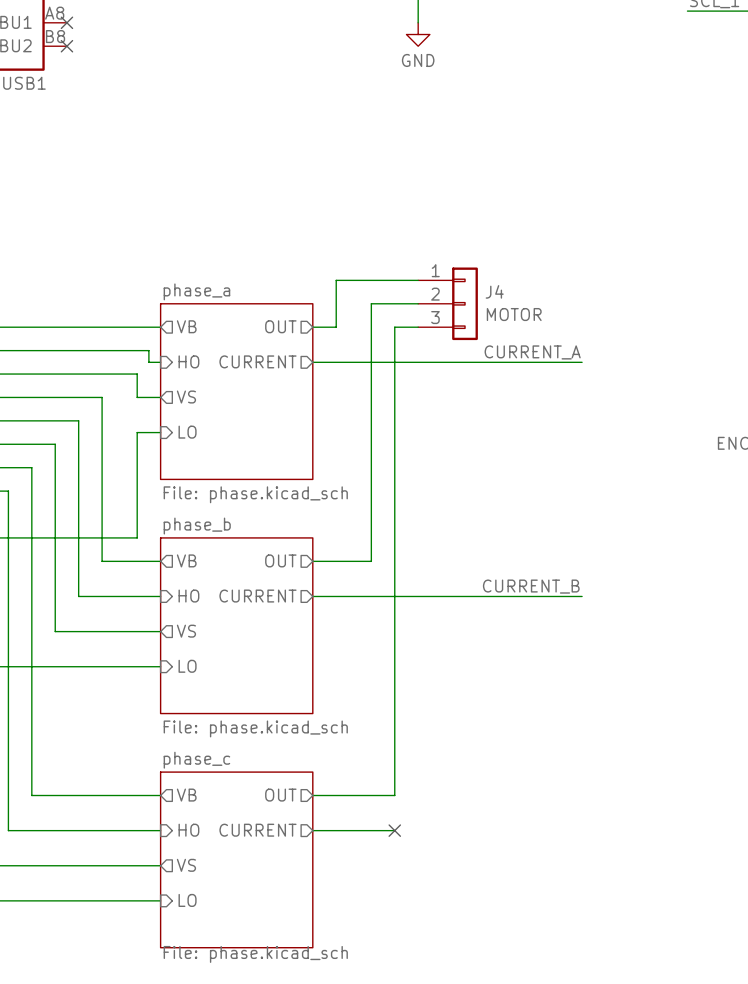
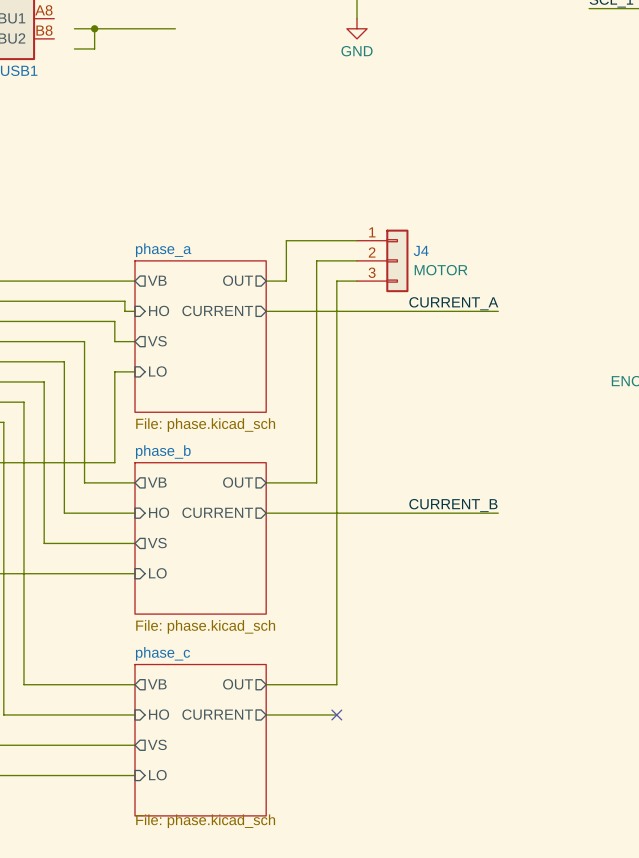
no-connect mark: (66, 22) -> none
wire: none -> (74, 28) (175, 28)
wire: none -> (94, 28) (94, 48) (74, 48)
junction: none -> (94, 28)
no-connect mark: (66, 46) -> none

